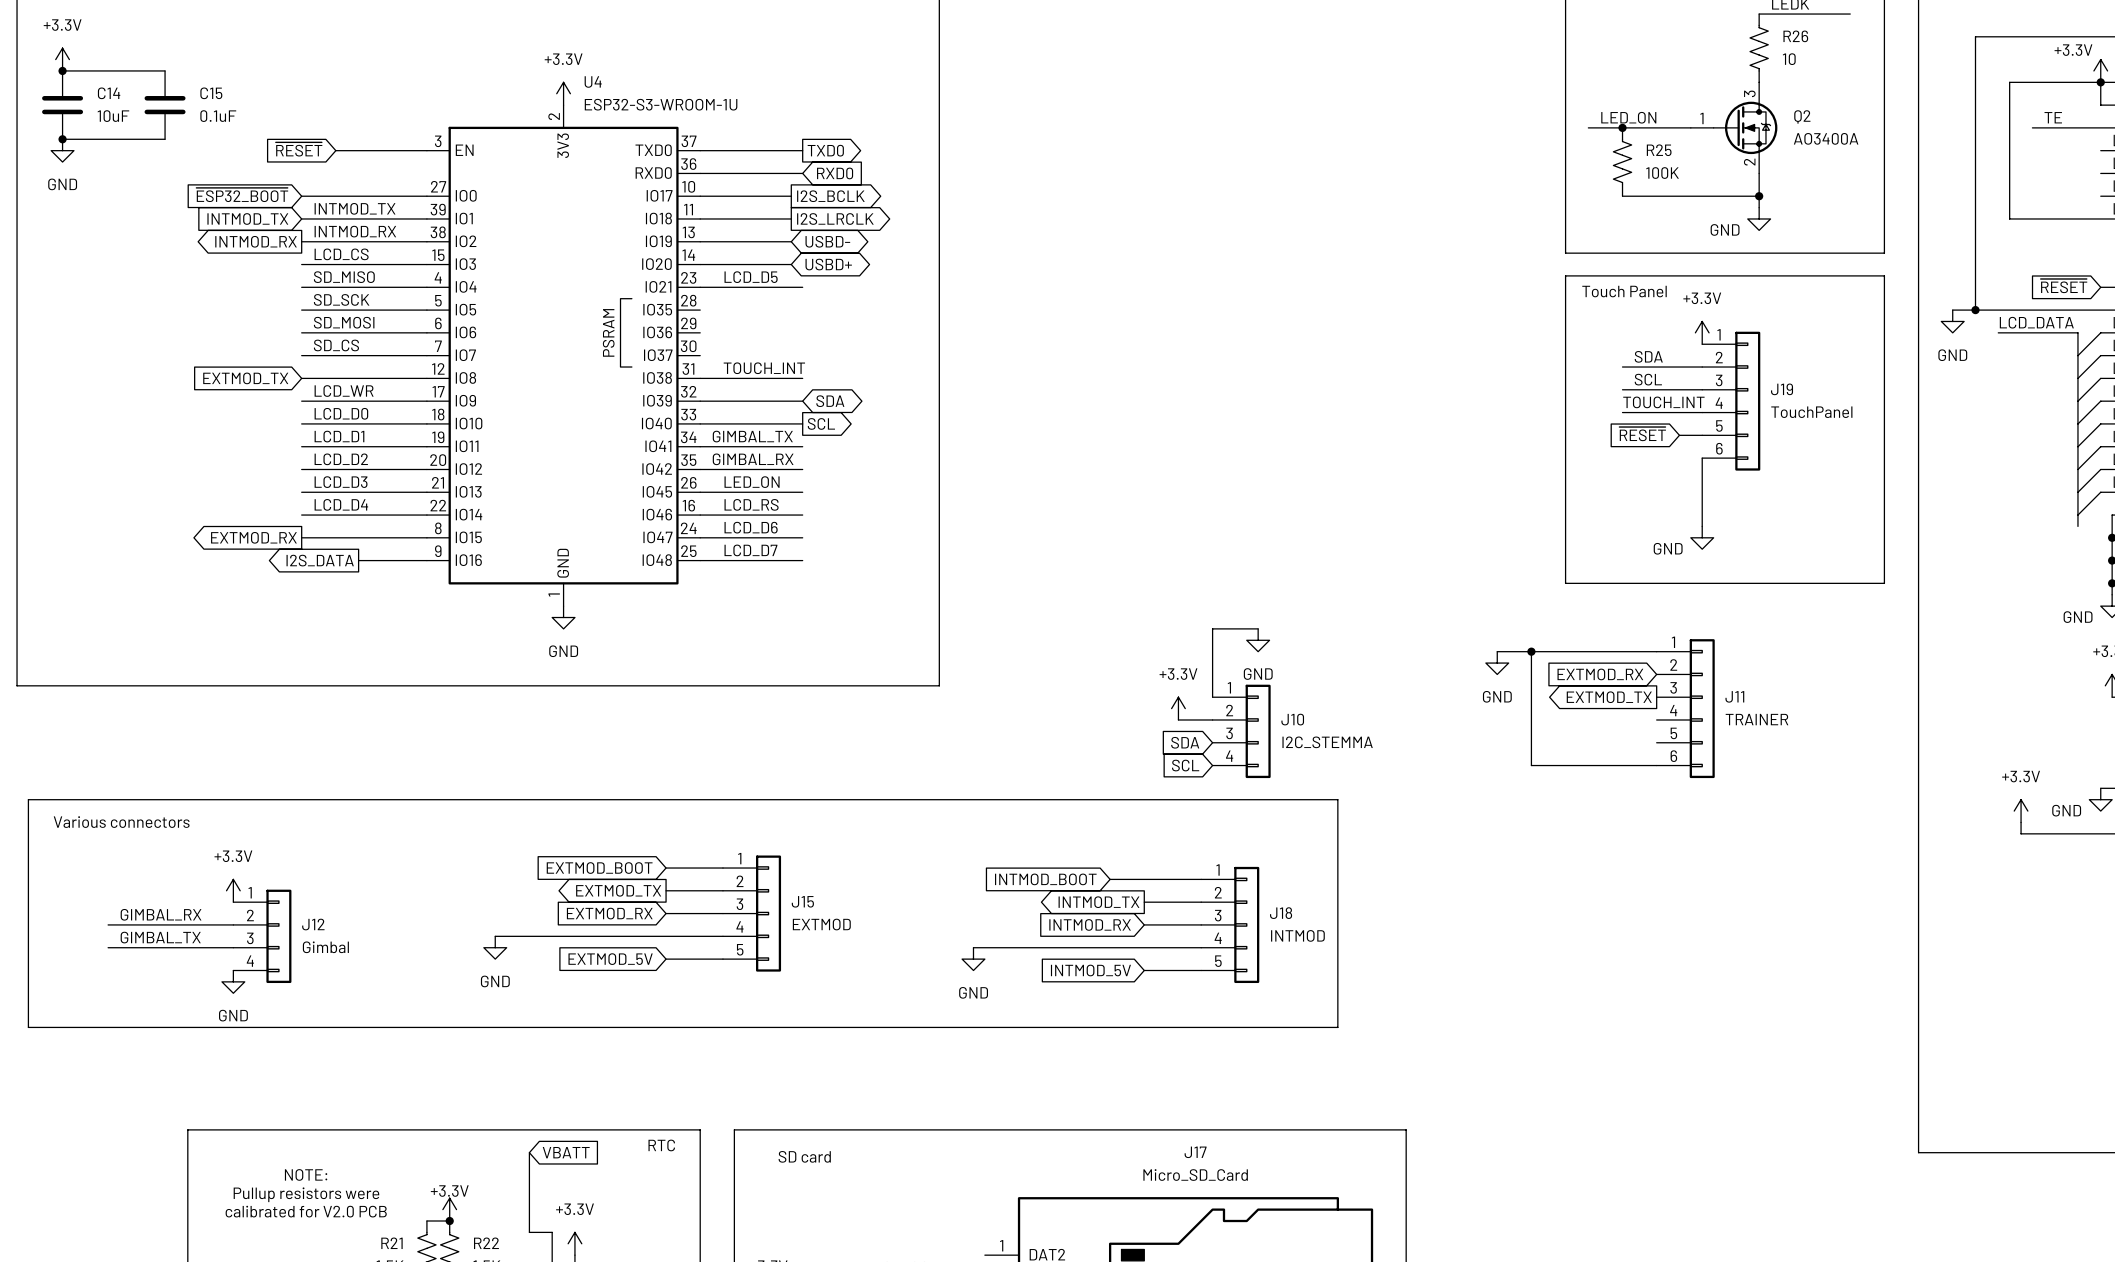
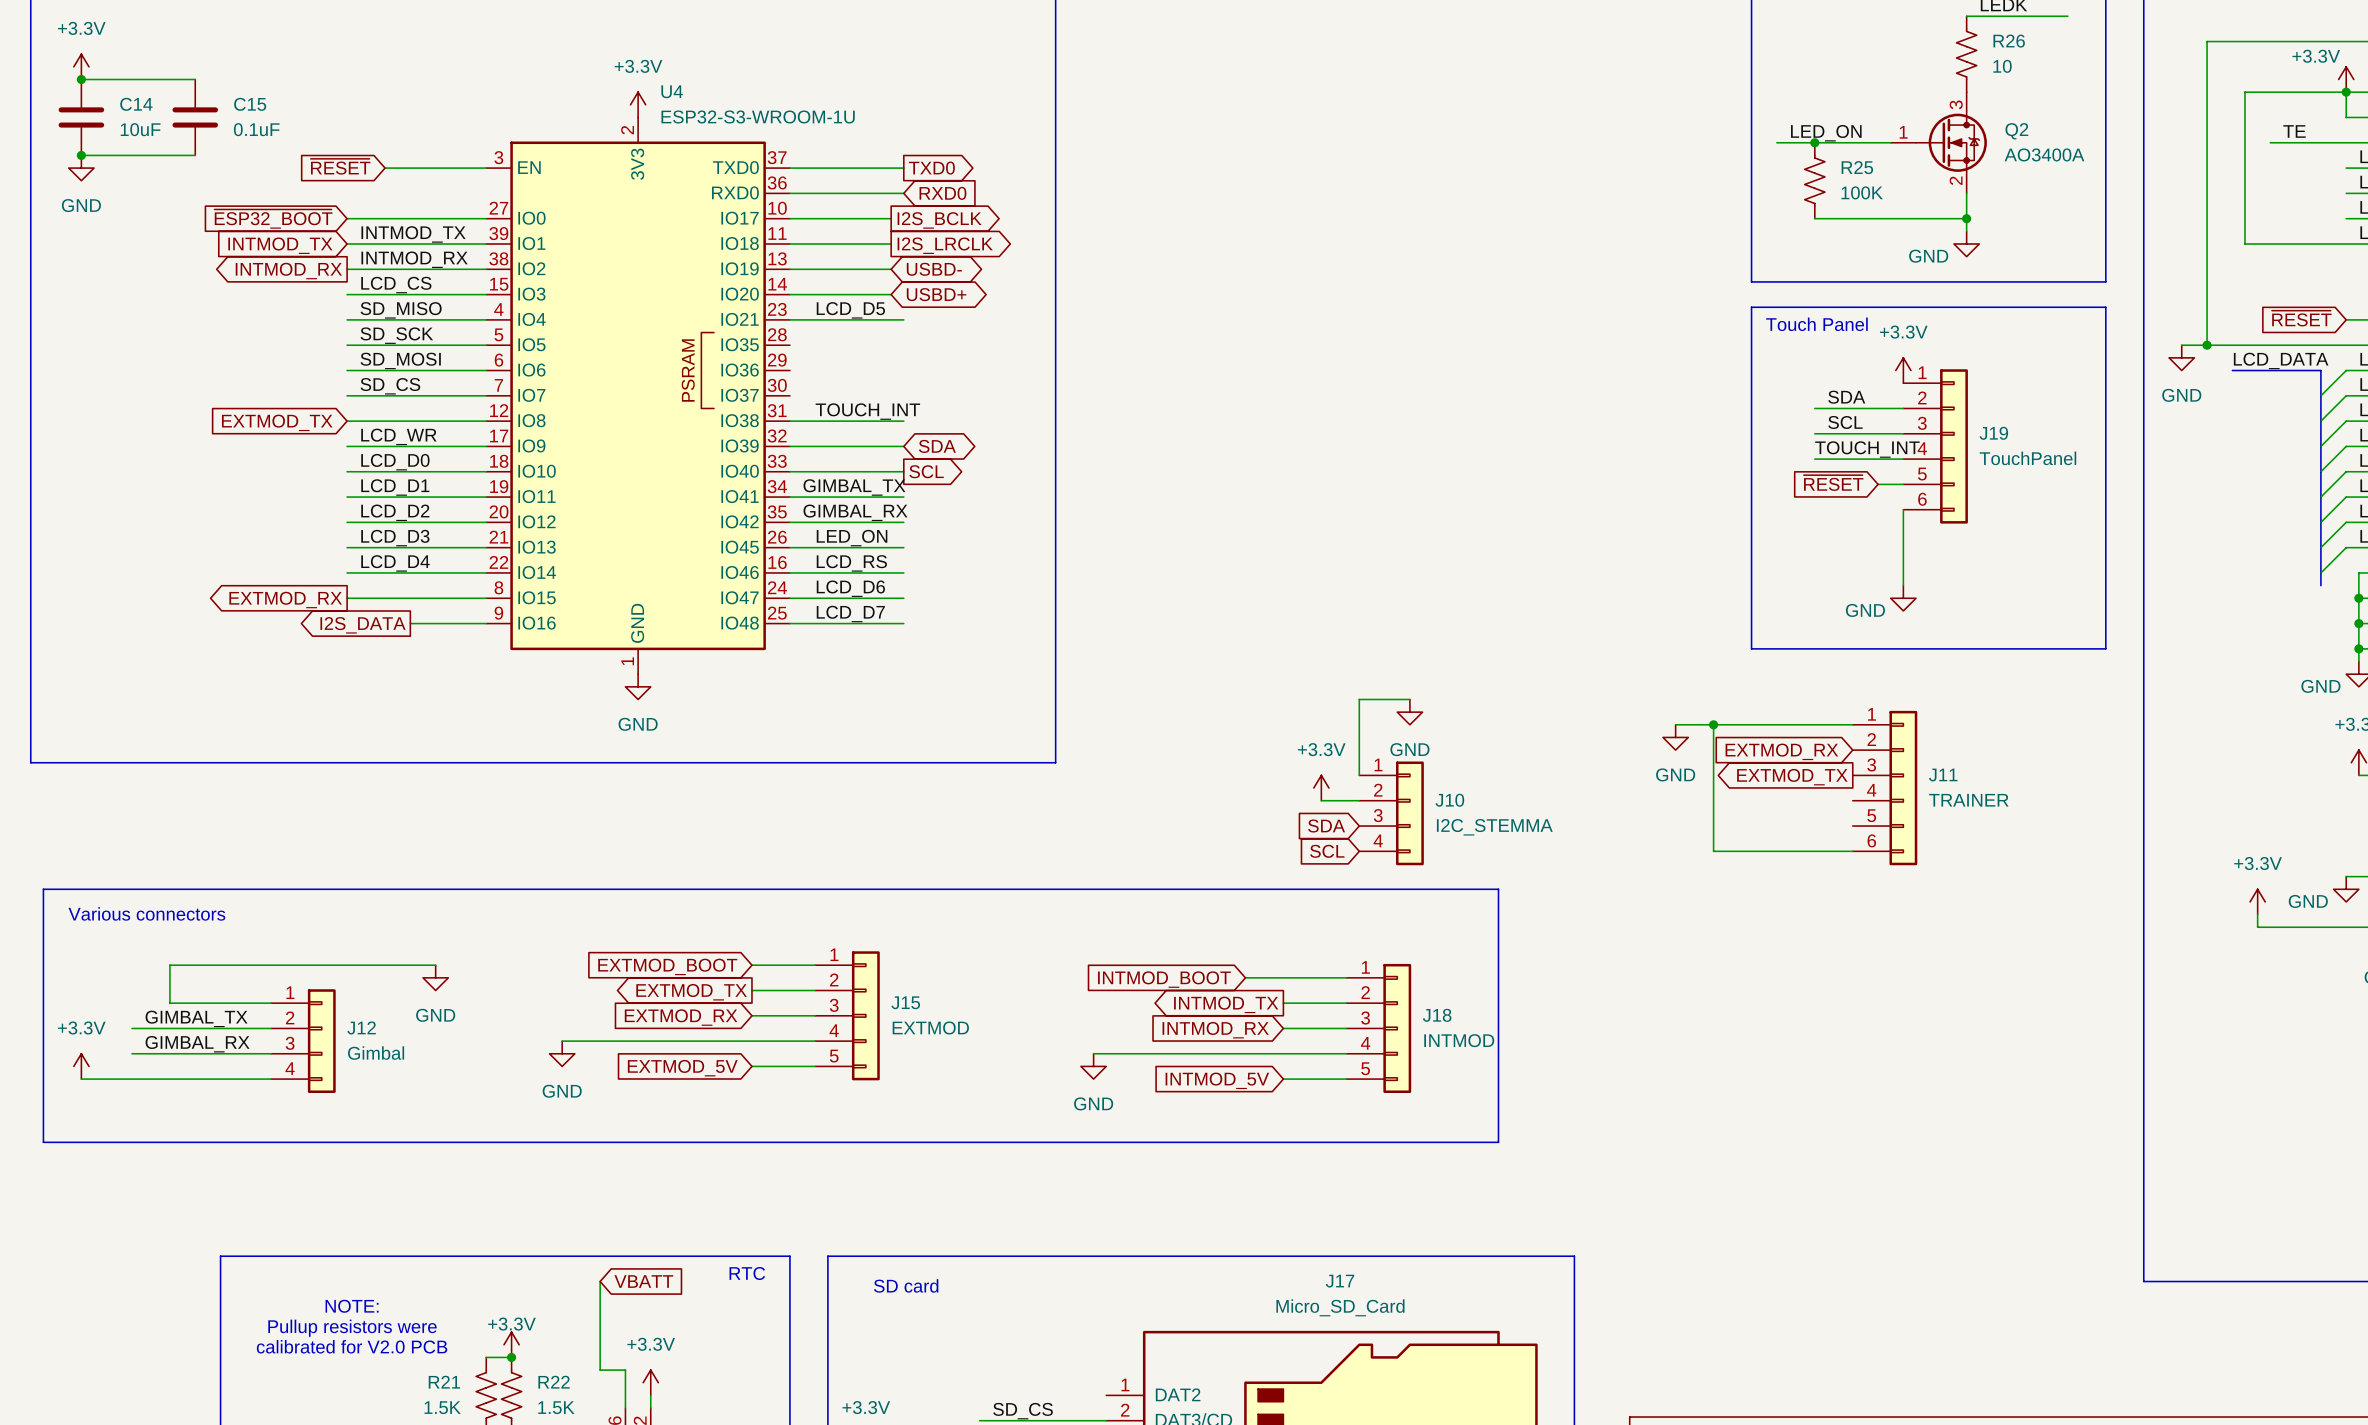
wire: none -> (435, 965) (169, 965) (169, 1003) (271, 1003)
power symbol position: +3.3V (233, 890) -> +3.3V (81, 1066)
label: GIMBAL_RX (161, 914) -> GIMBAL_TX (196, 1018)
label: GIMBAL_TX (160, 937) -> GIMBAL_RX (197, 1044)
wire: none -> (81, 1079) (271, 1079)
power symbol position: GND (233, 981) -> GND (435, 977)

